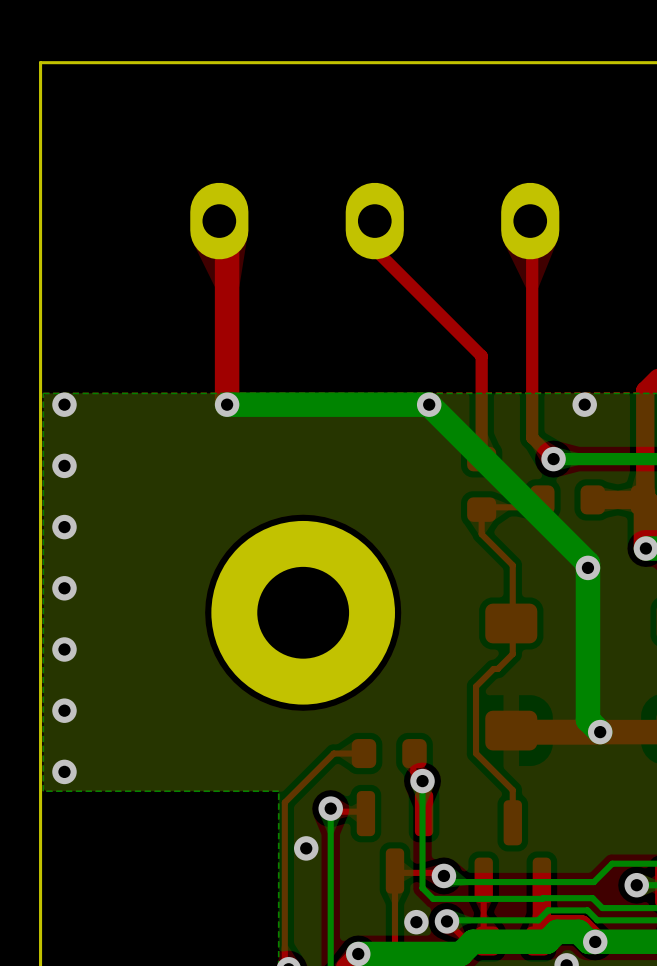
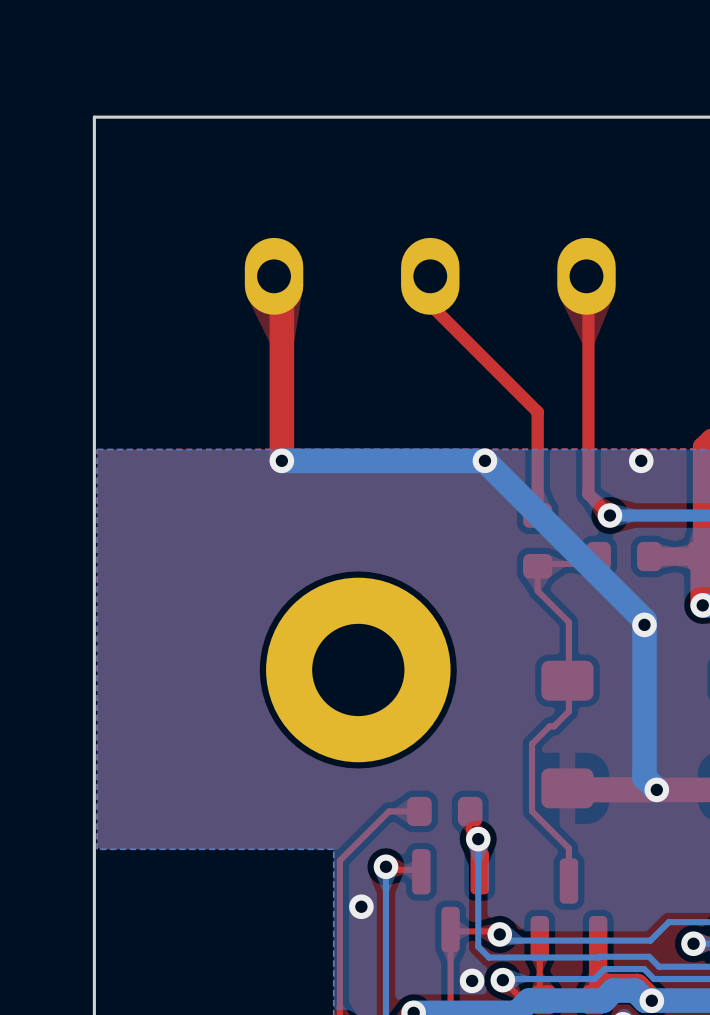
via: (64, 404) -> none
via: (64, 465) -> none
via: (64, 527) -> none
via: (64, 588) -> none
via: (64, 649) -> none
via: (64, 710) -> none
via: (64, 771) -> none

